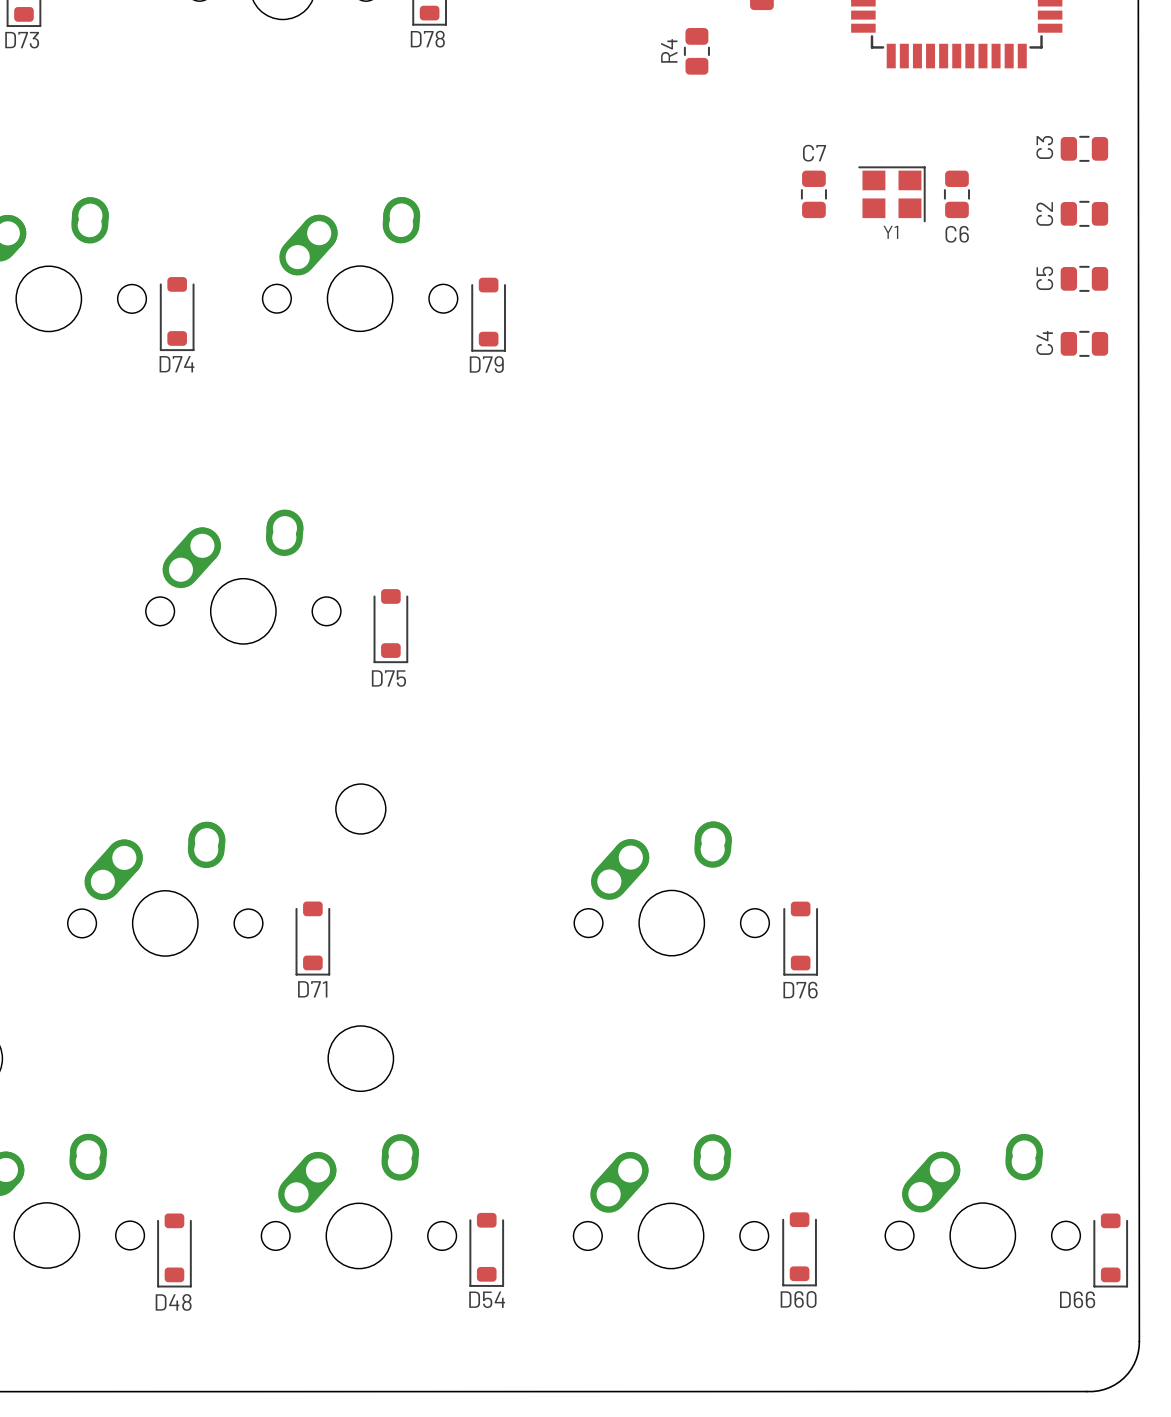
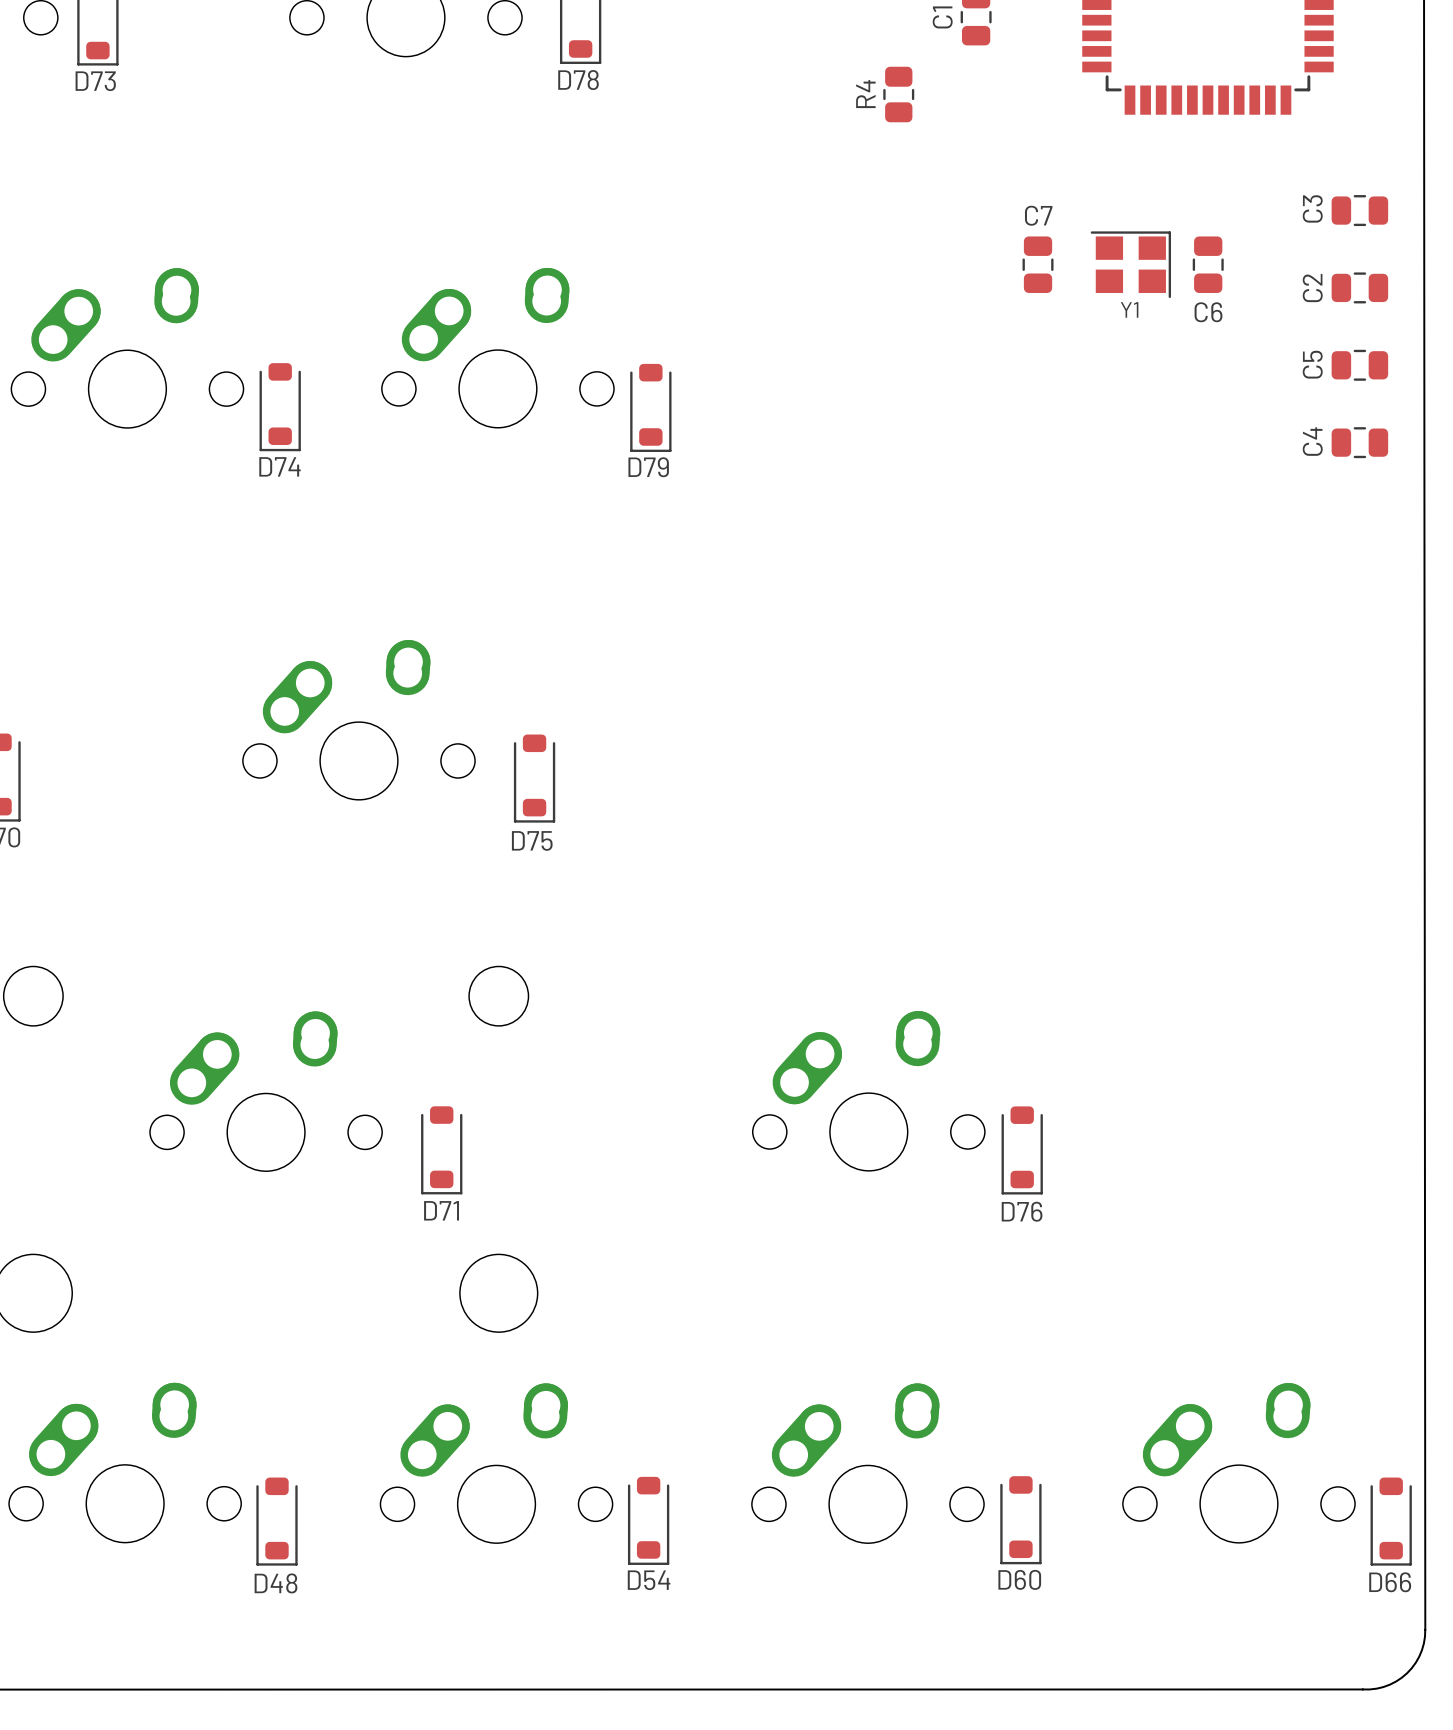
D66 name position: D66 (1077, 1299) -> D66 (1390, 1582)

